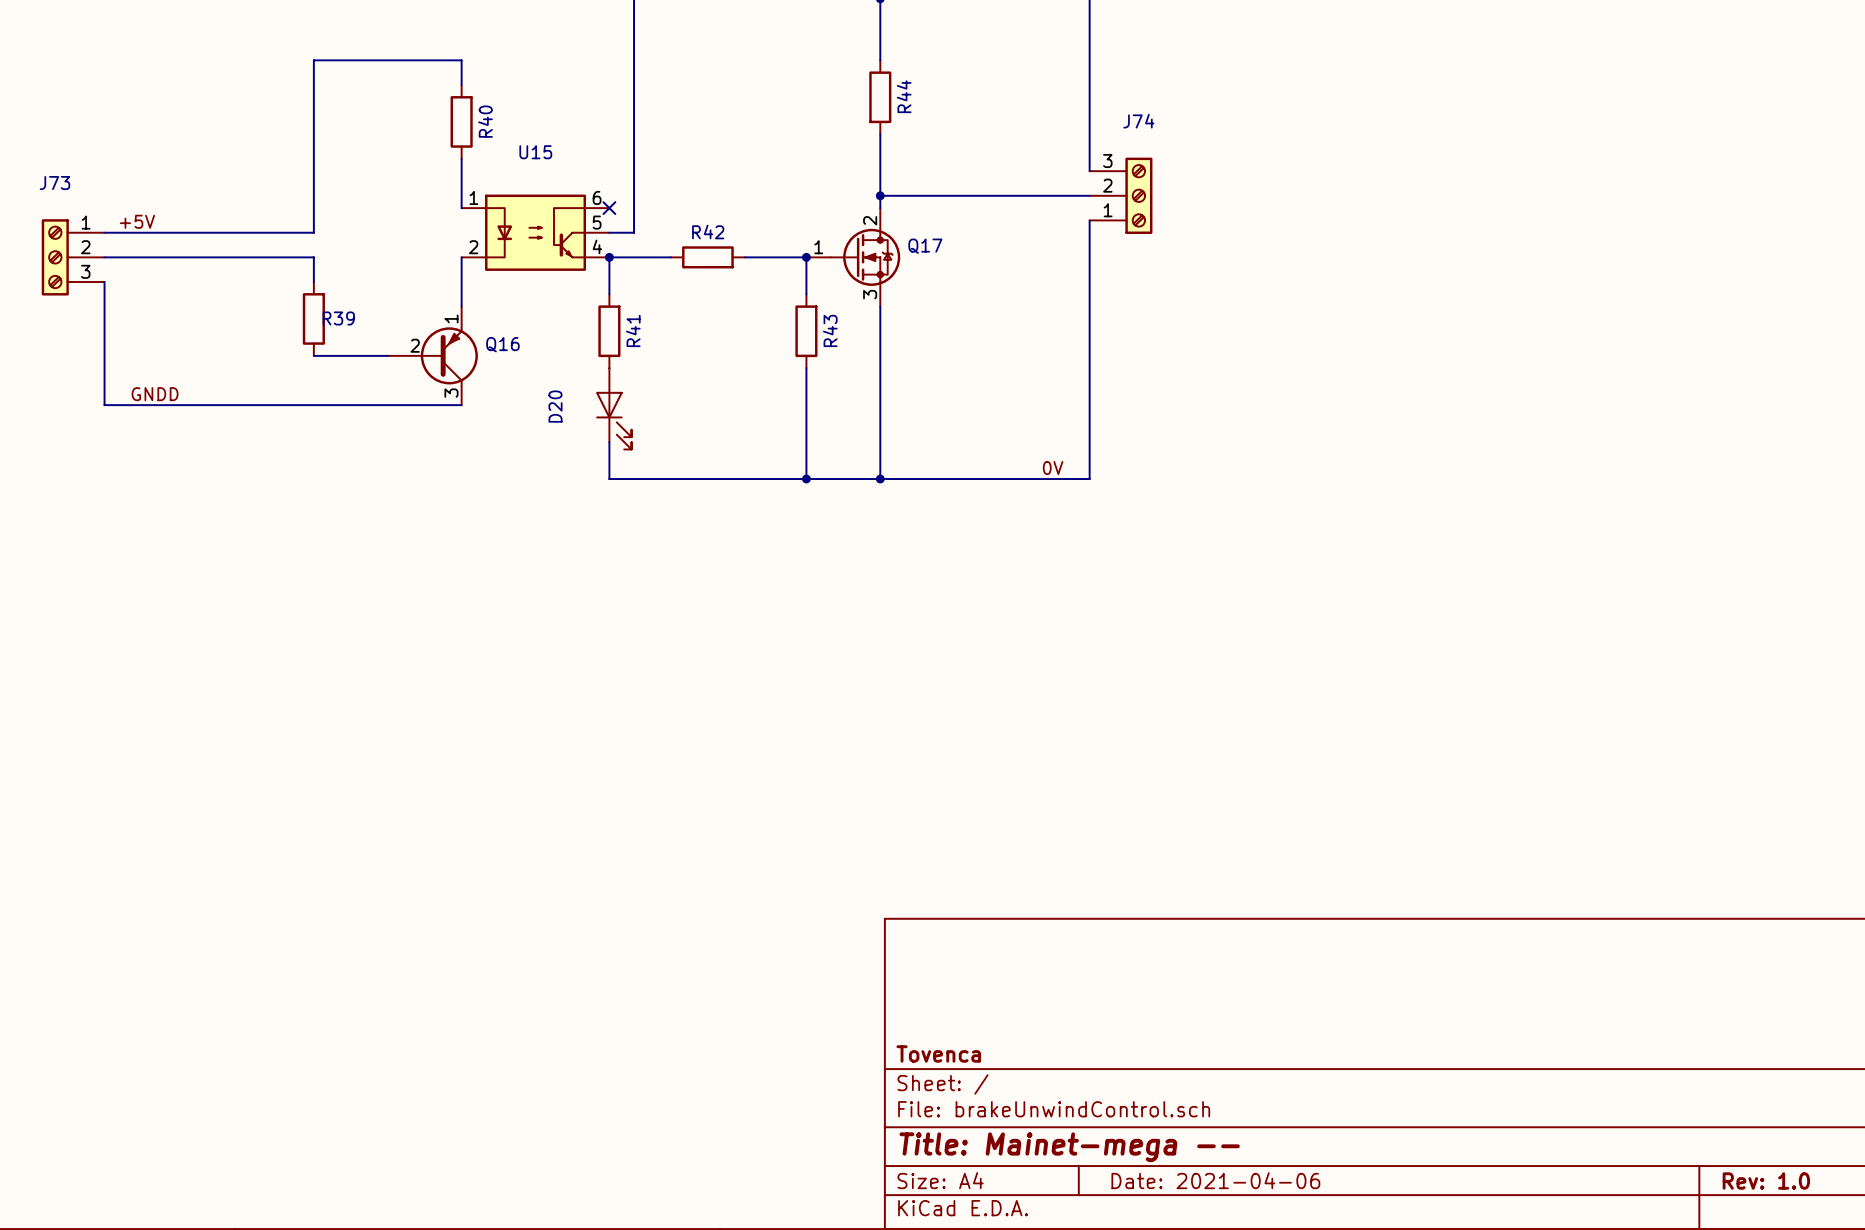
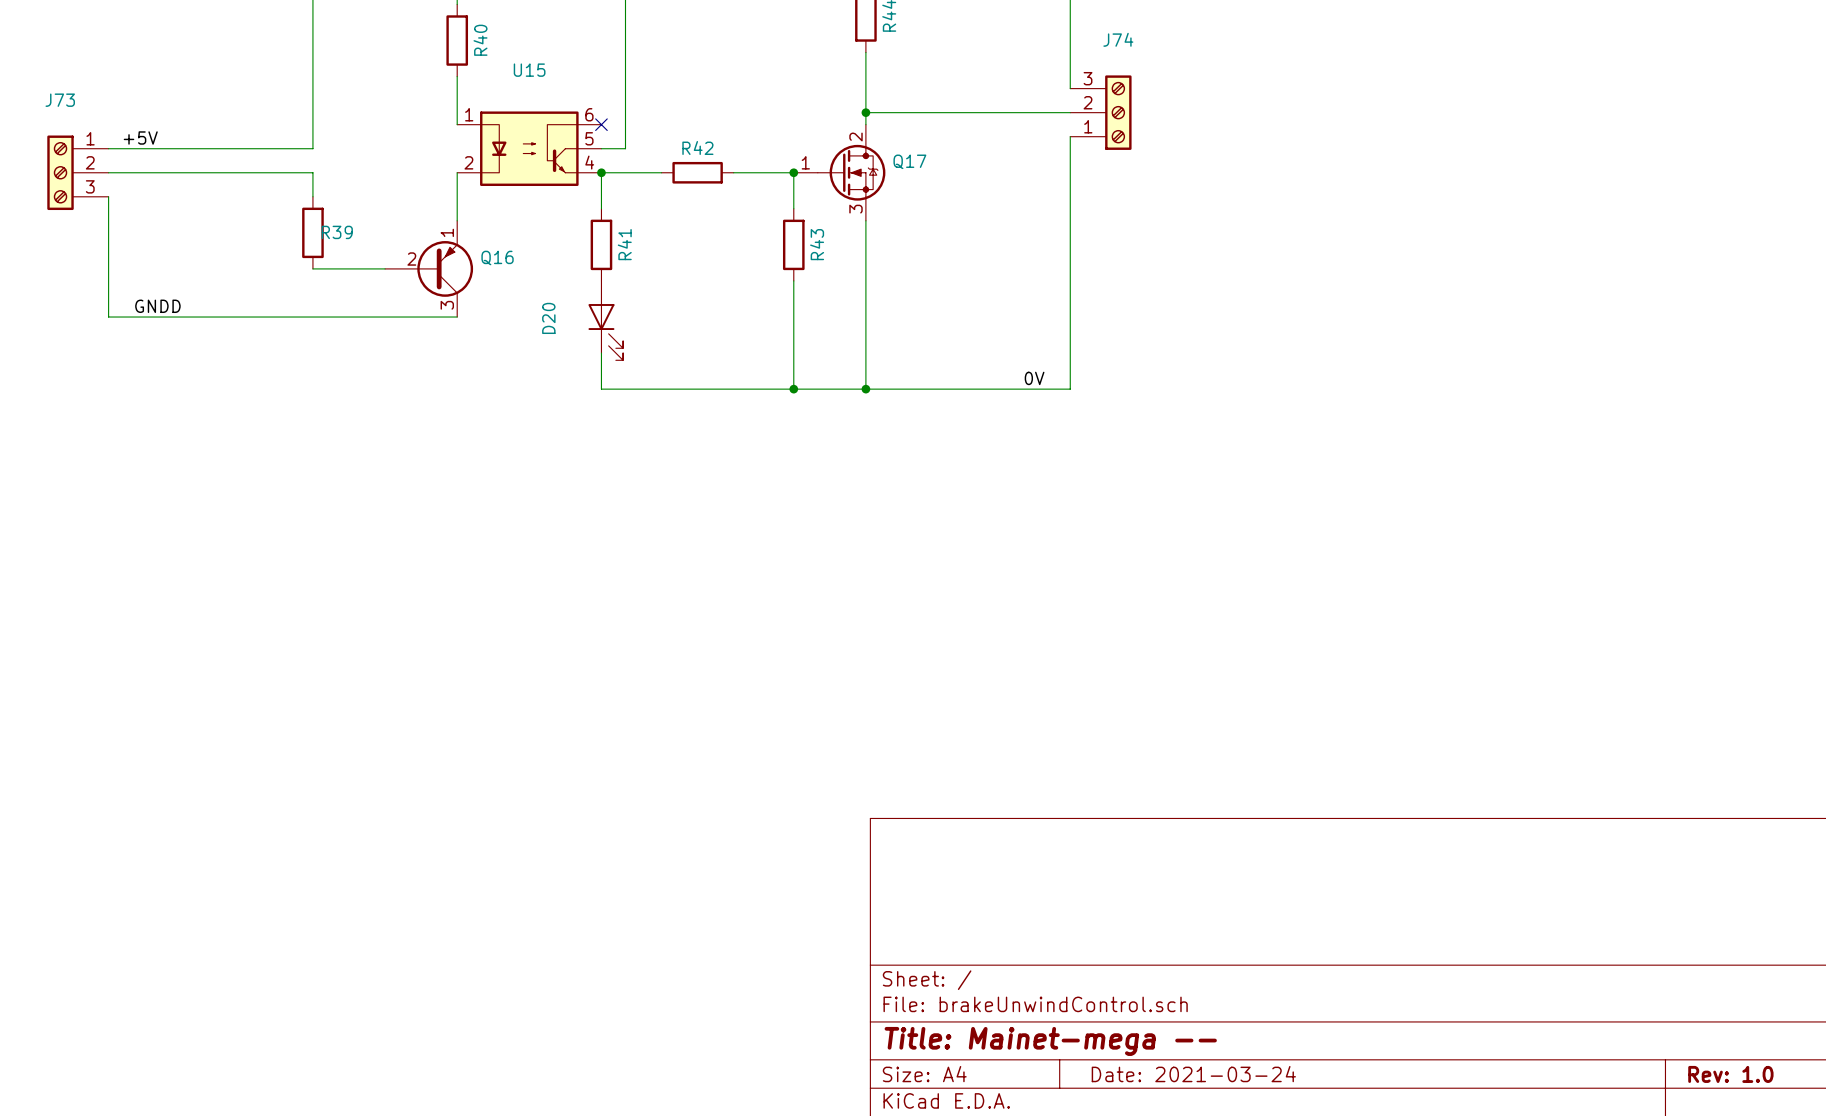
title block: Tovenca (938, 1053) -> none
title block: Date: 2021-04-06 (1215, 1180) -> Date: 2021-03-24 (1193, 1074)

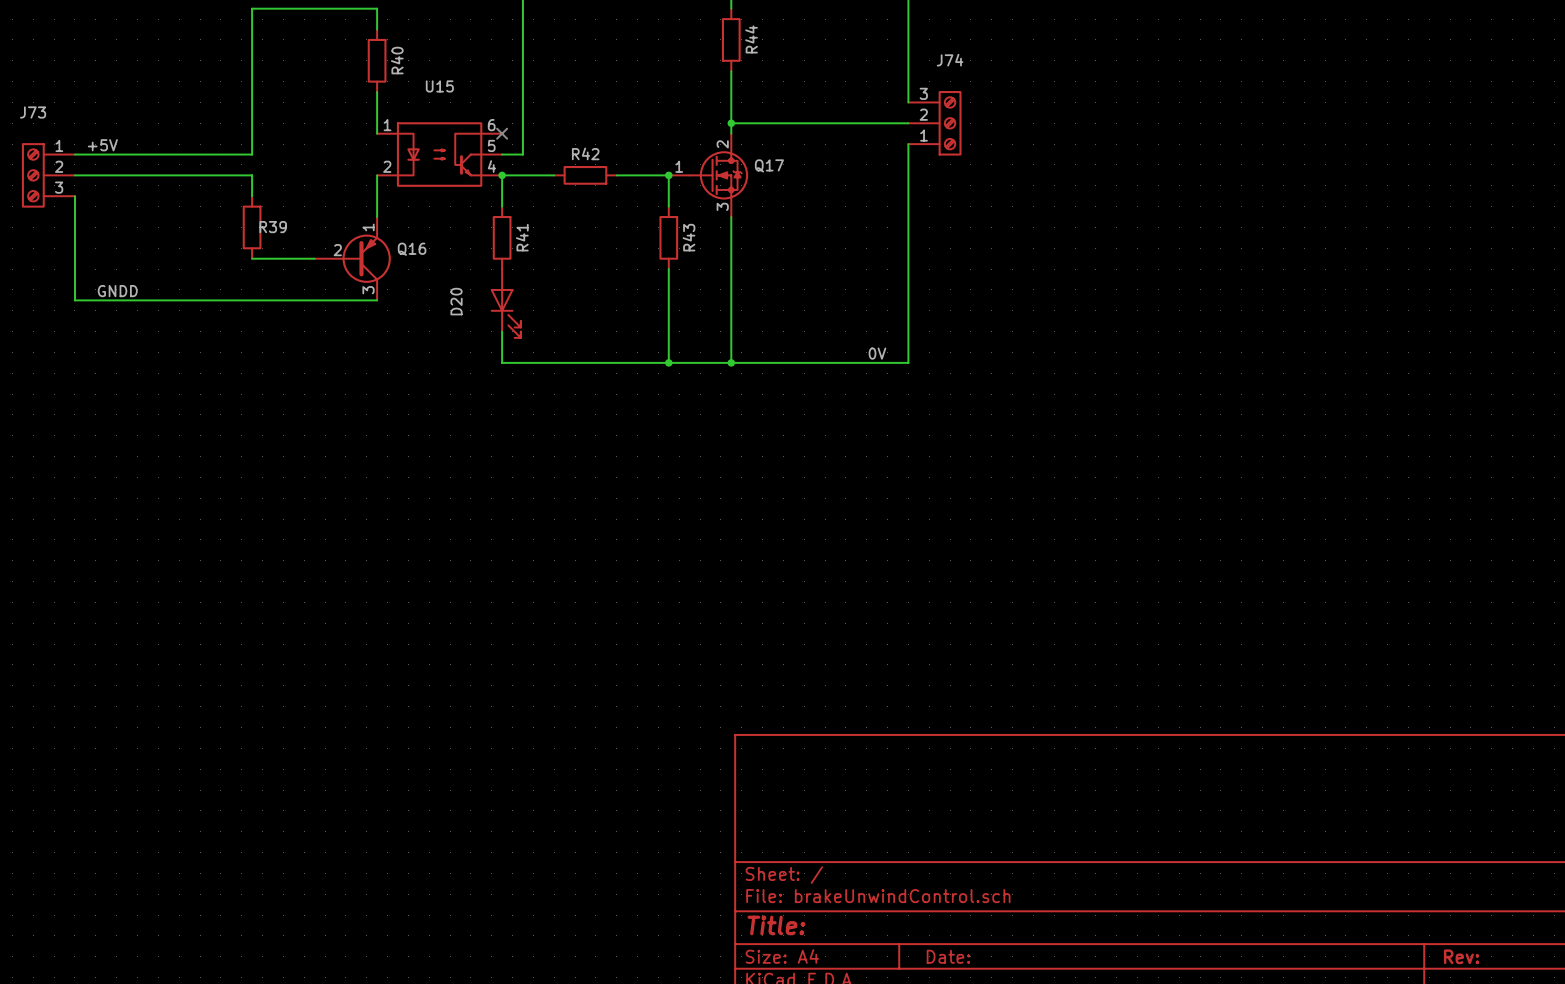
title block: Title: Mainet-mega -- (1050, 1041) -> Title: (776, 925)
title block: Date: 2021-03-24 (1193, 1074) -> Date: (948, 956)
title block: Rev: 1.0 (1730, 1074) -> Rev: (1461, 956)

